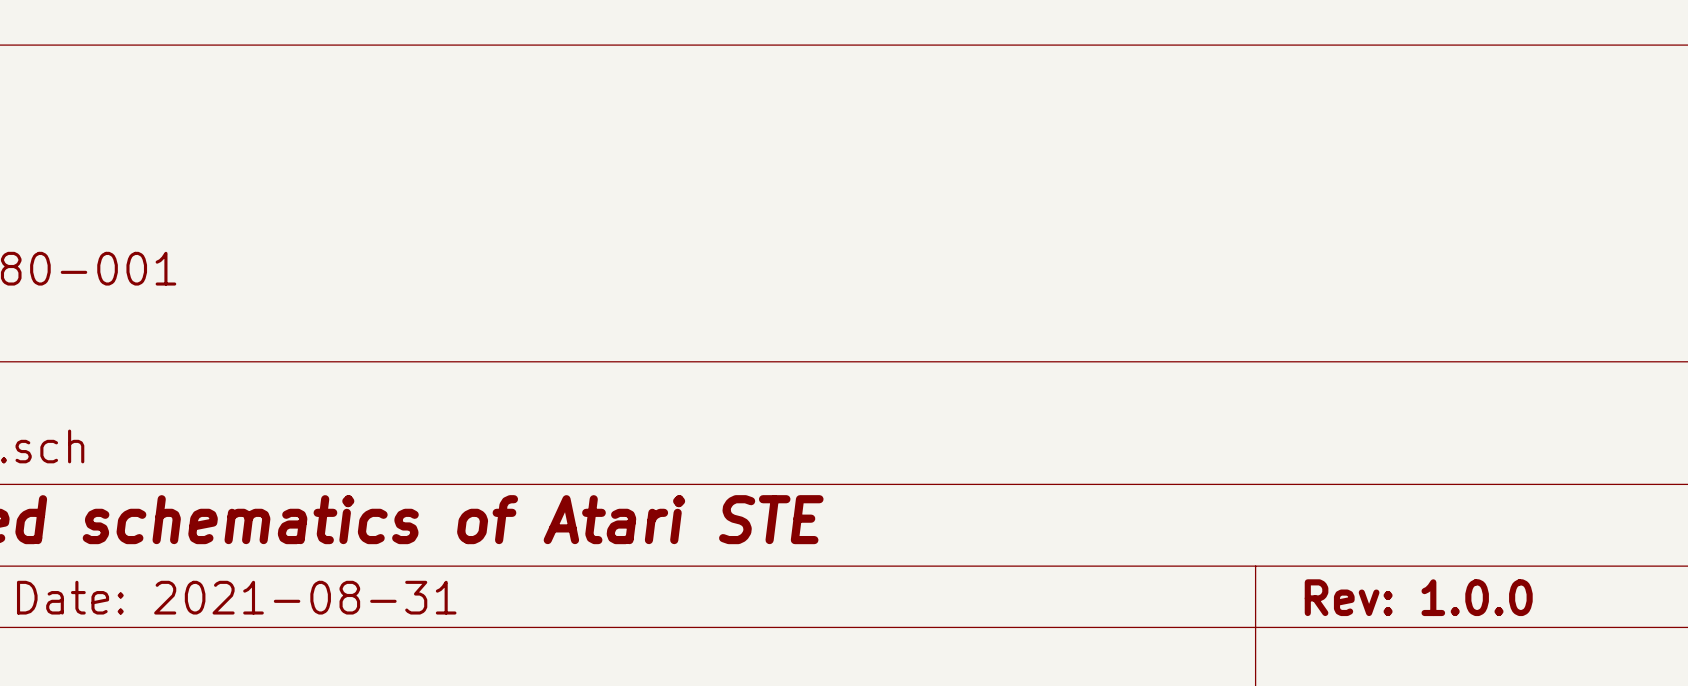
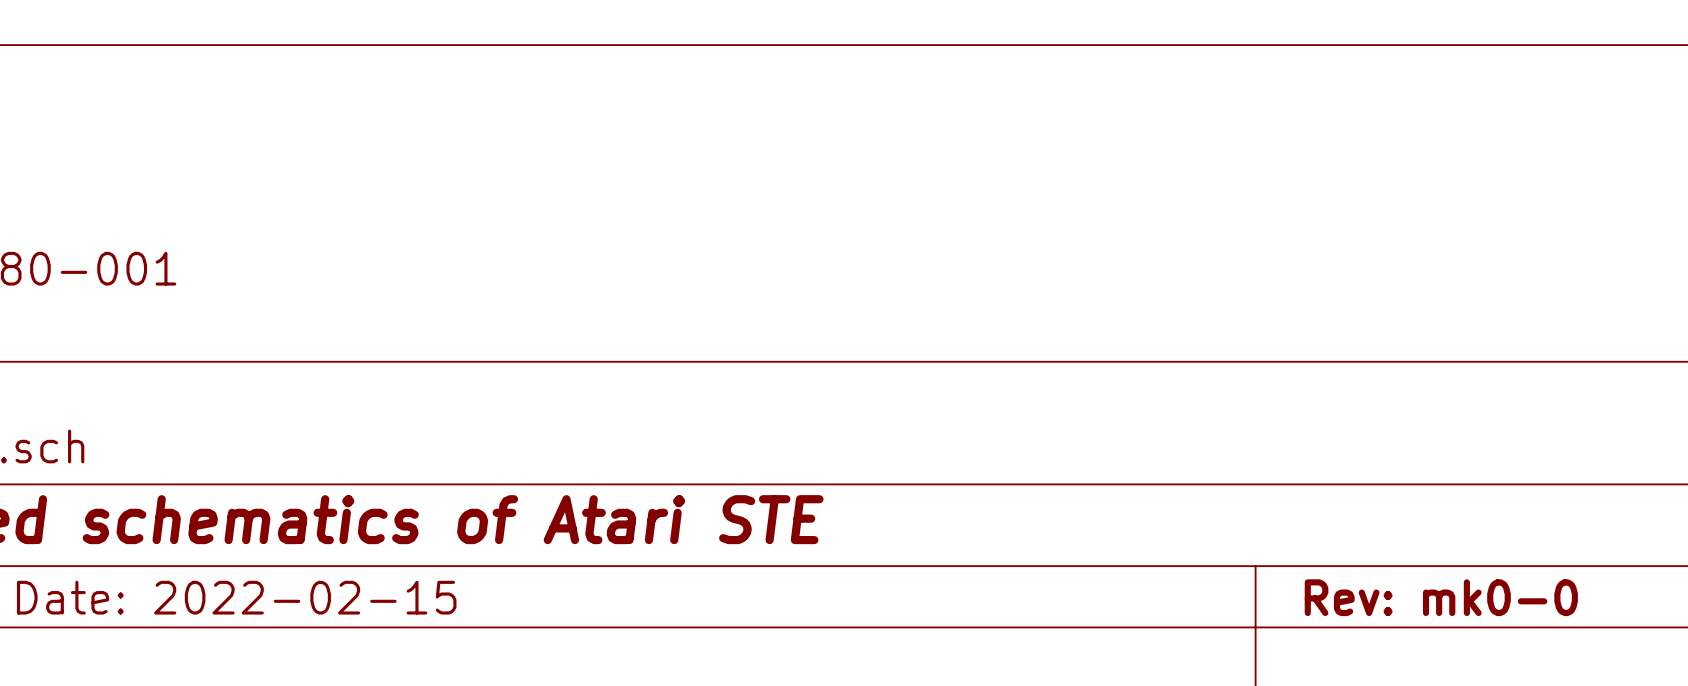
title block: Date: 2021-08-31 (236, 597) -> Date: 2022-02-15 (236, 597)
title block: Rev: 1.0.0 (1418, 597) -> Rev: mk0-0 (1441, 597)

